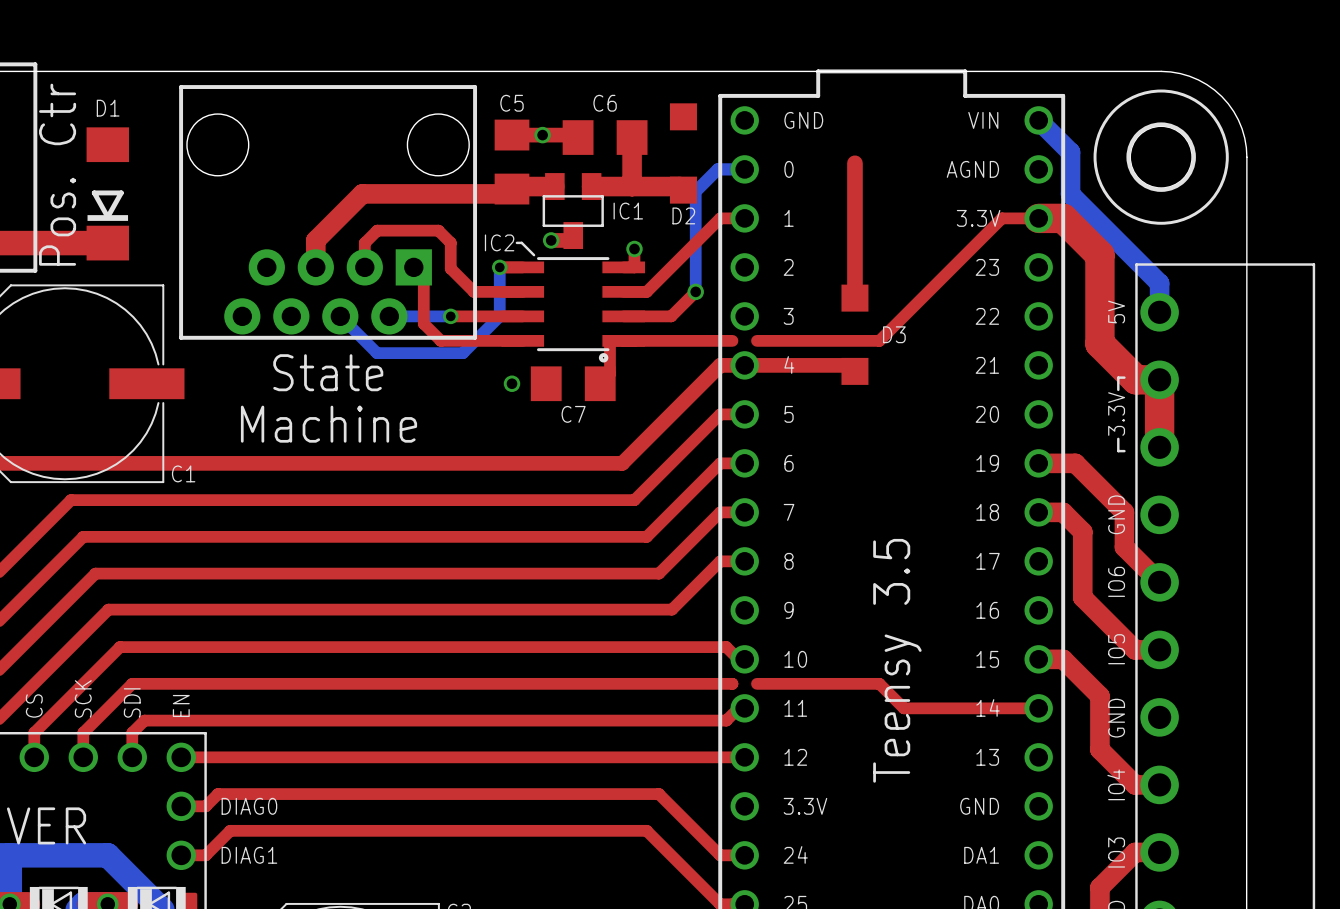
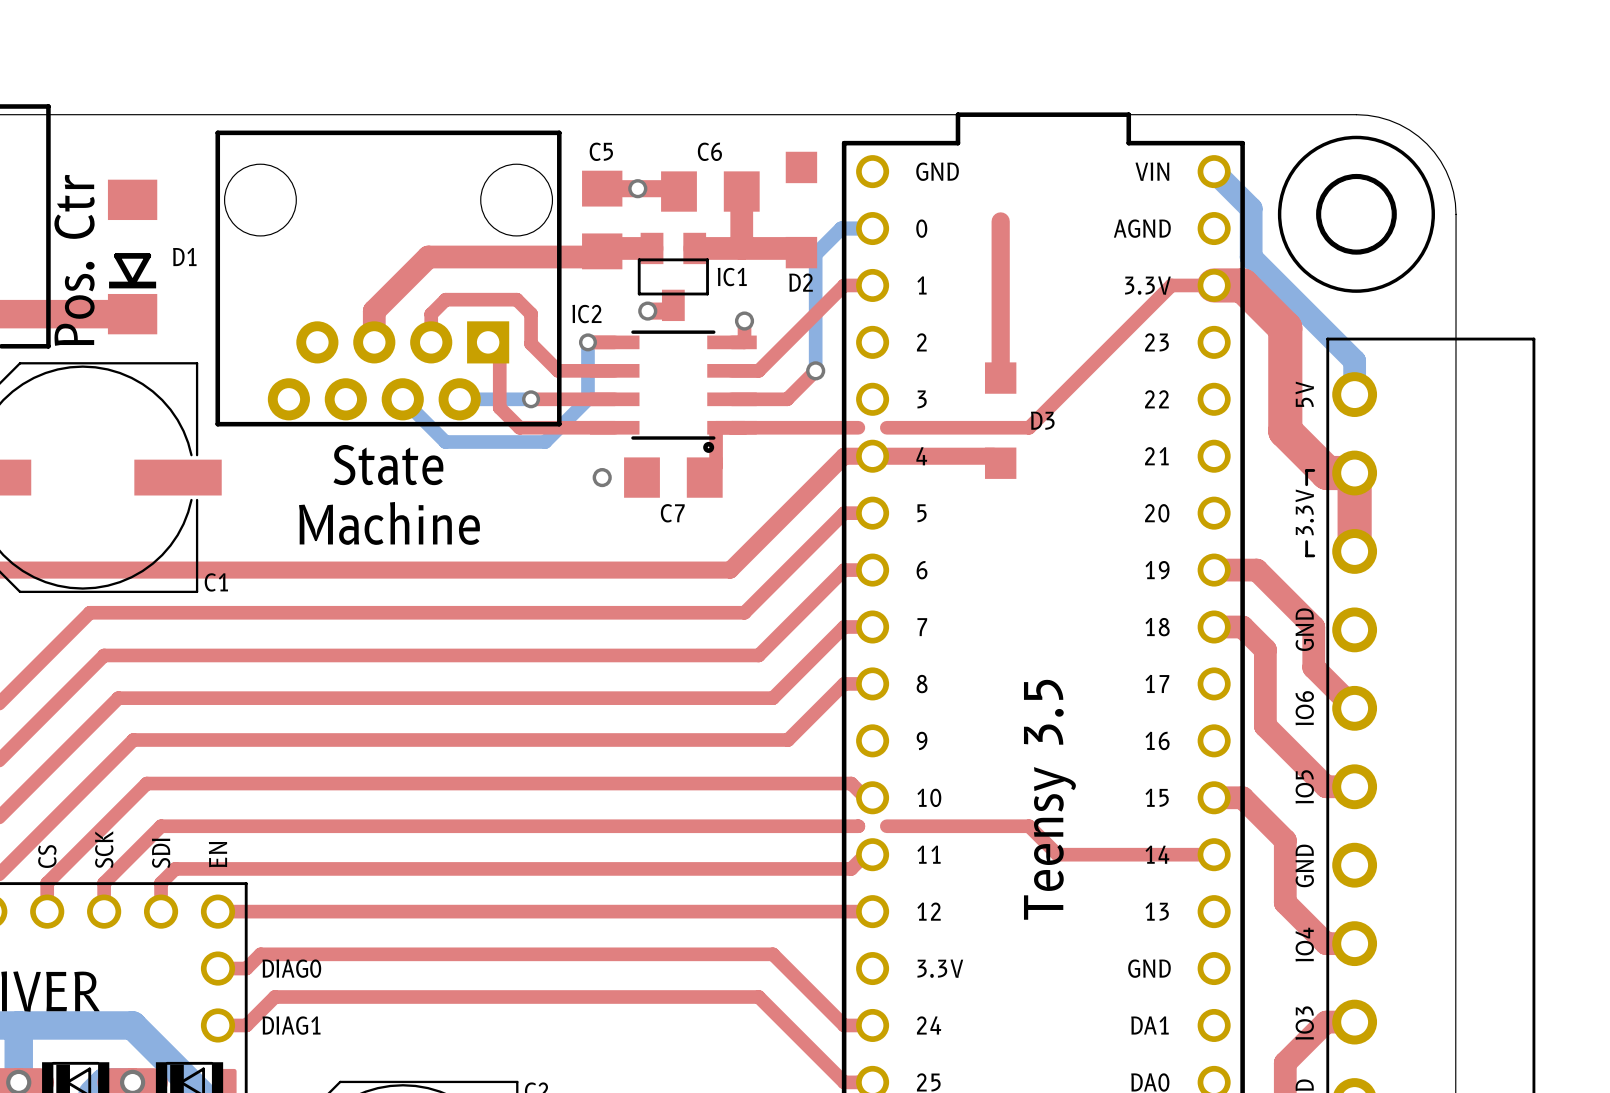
D1 name position: D1 (108, 108) -> D1 (184, 257)
line: (516, 242) (521, 242) (534, 255) -> none

